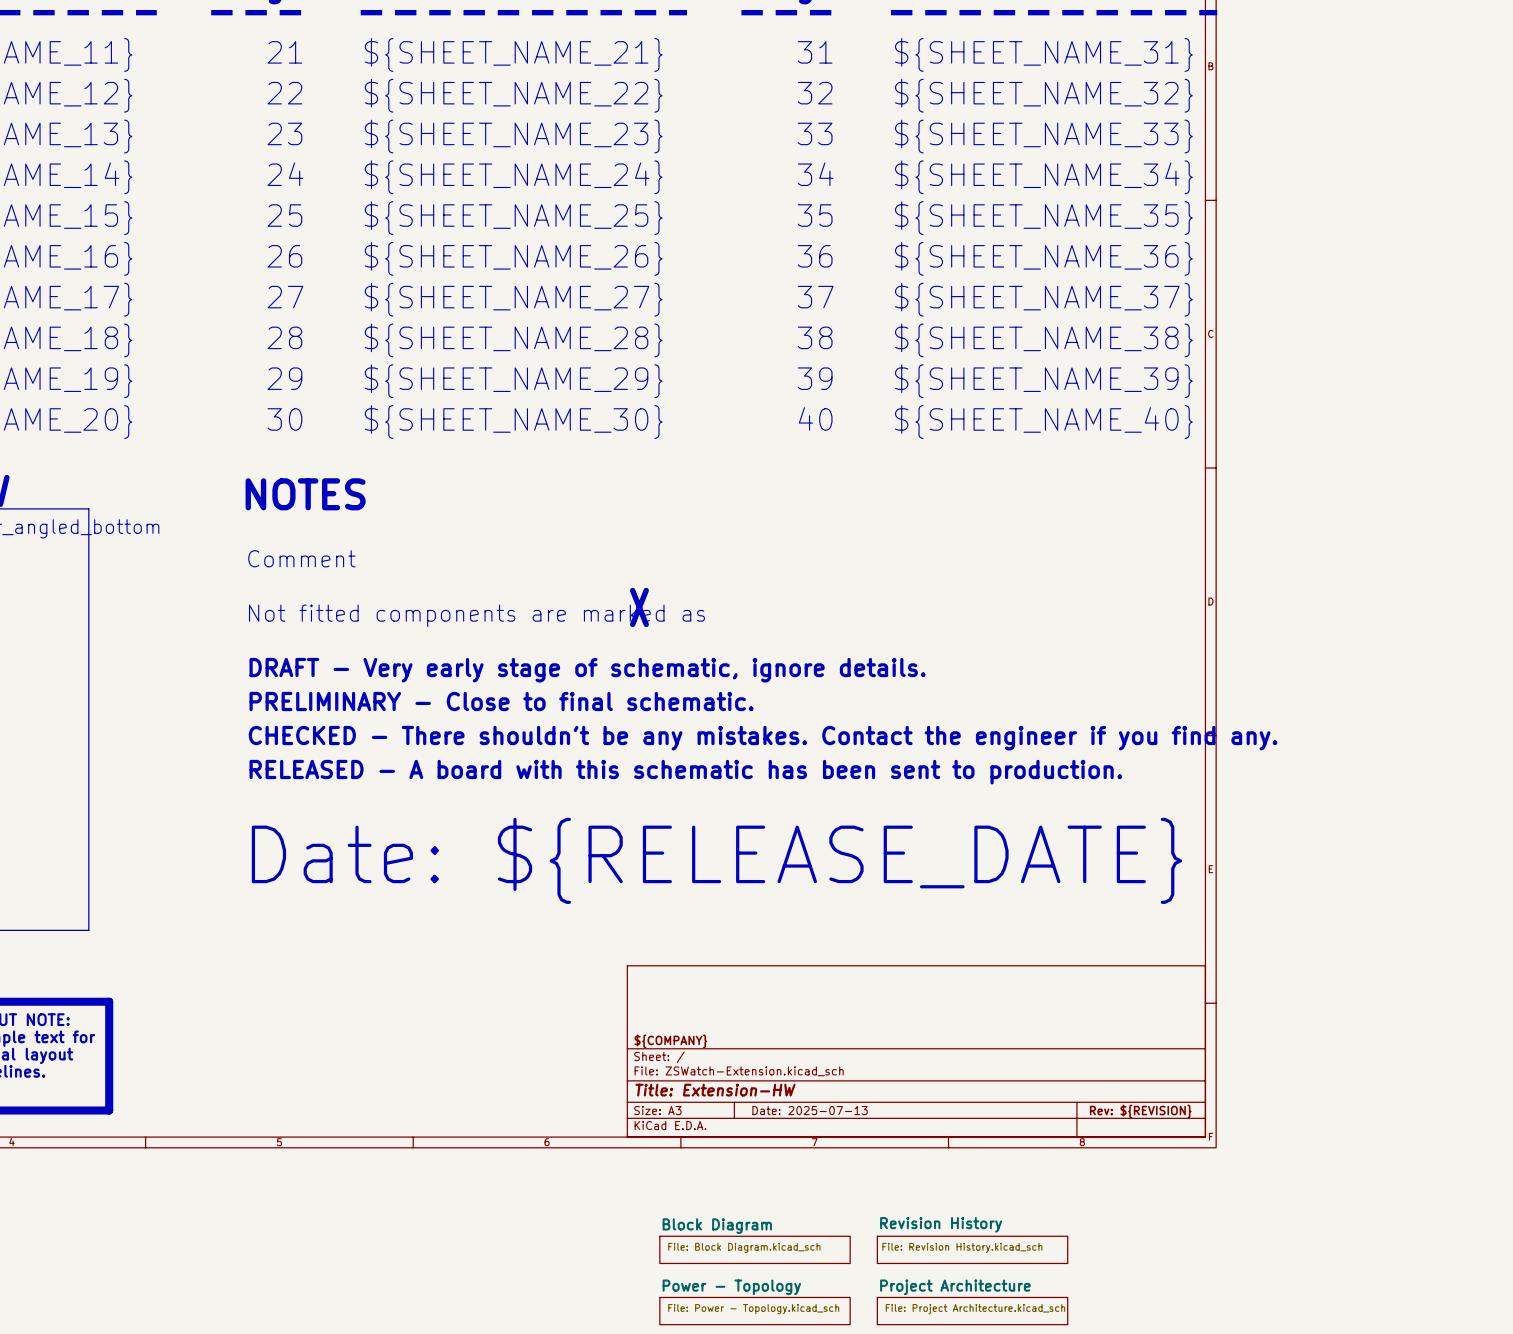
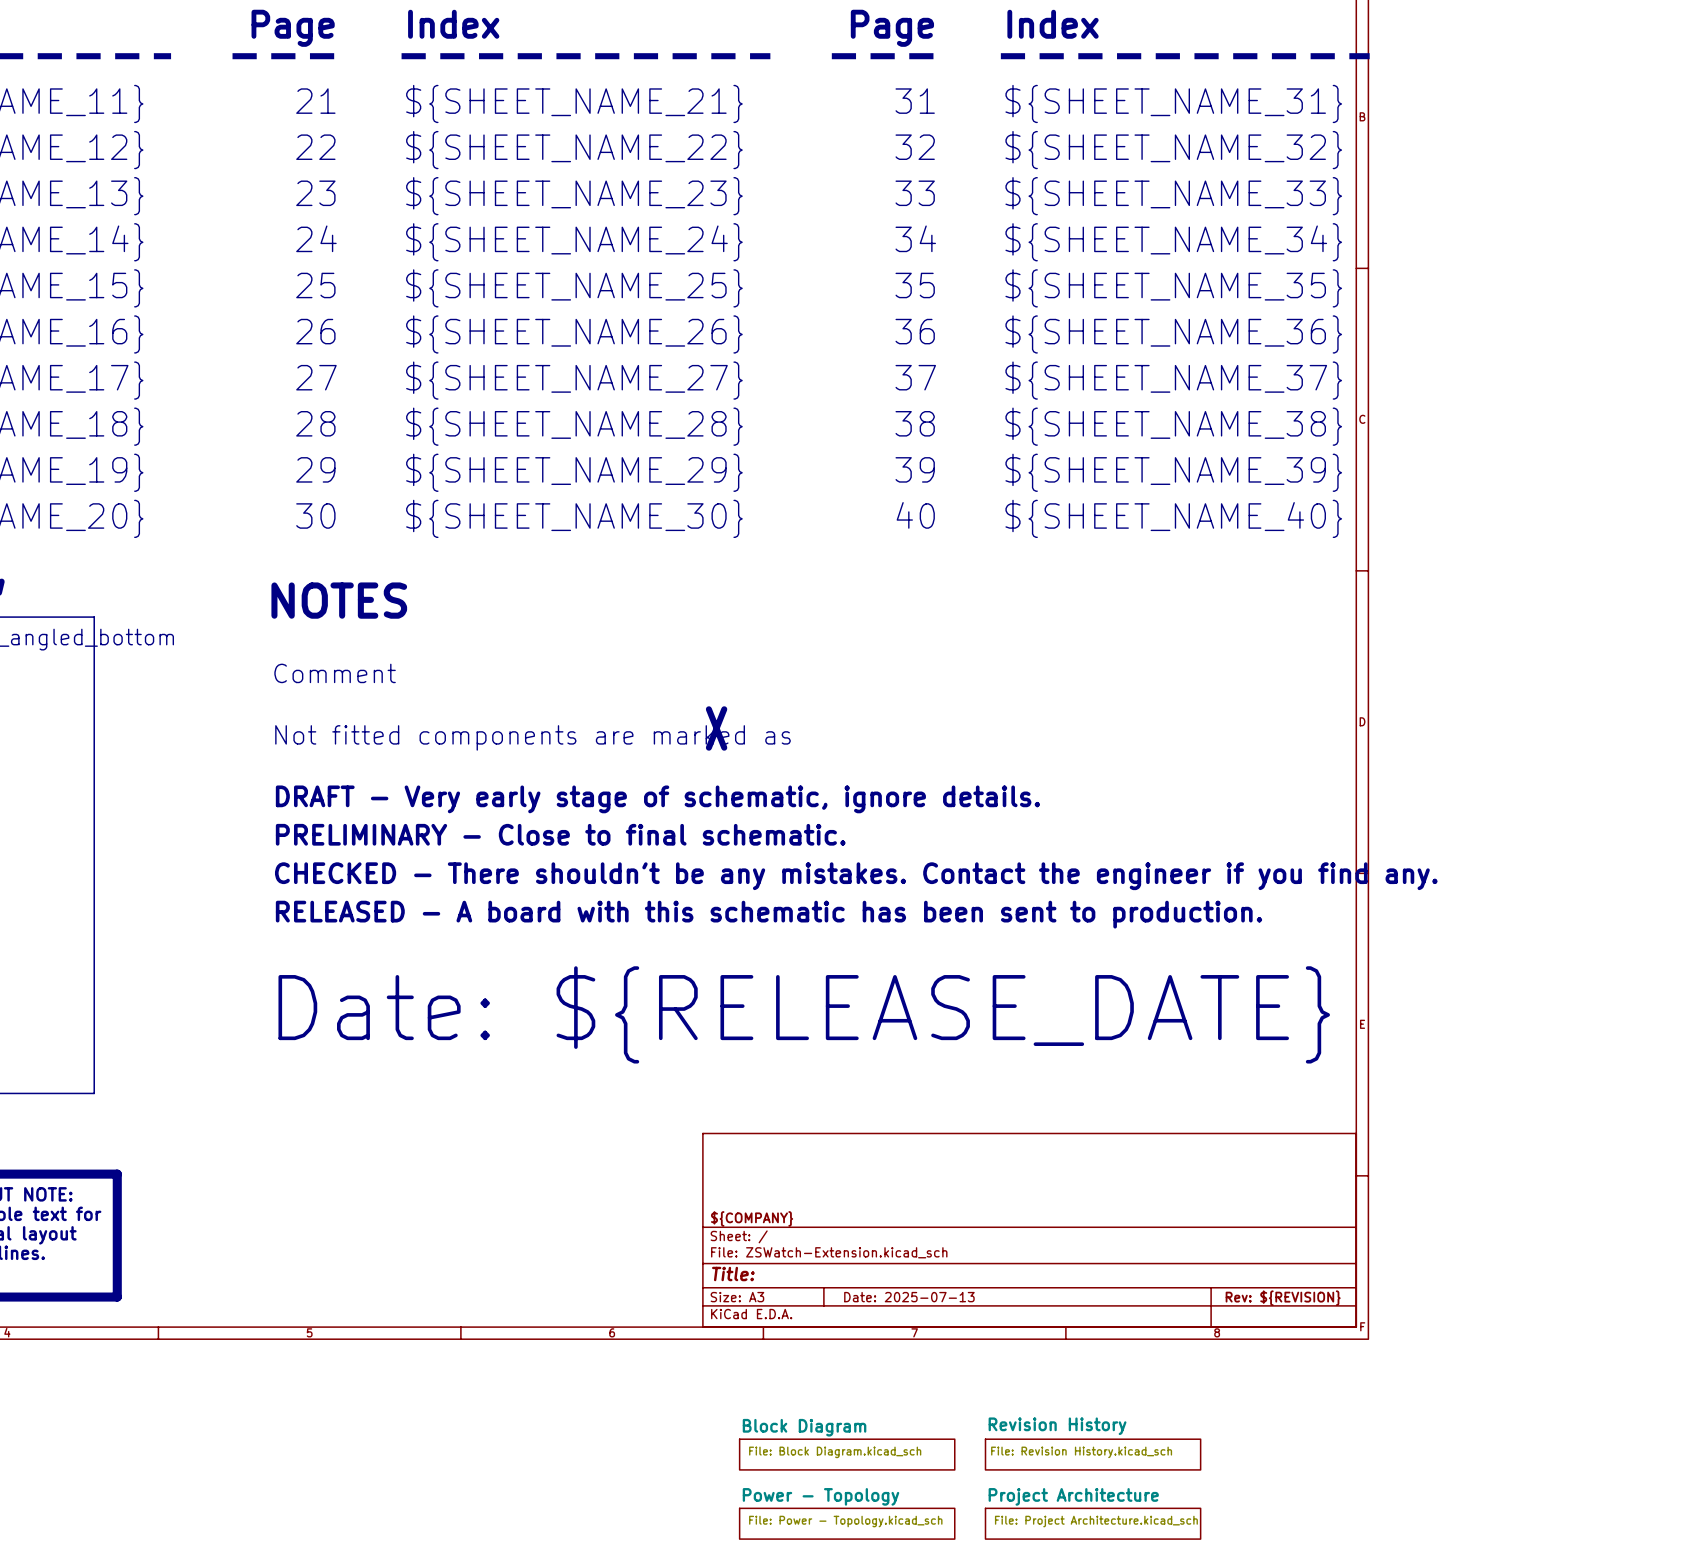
title block: Title: Extension-HW (715, 1090) -> Title: (733, 1274)

